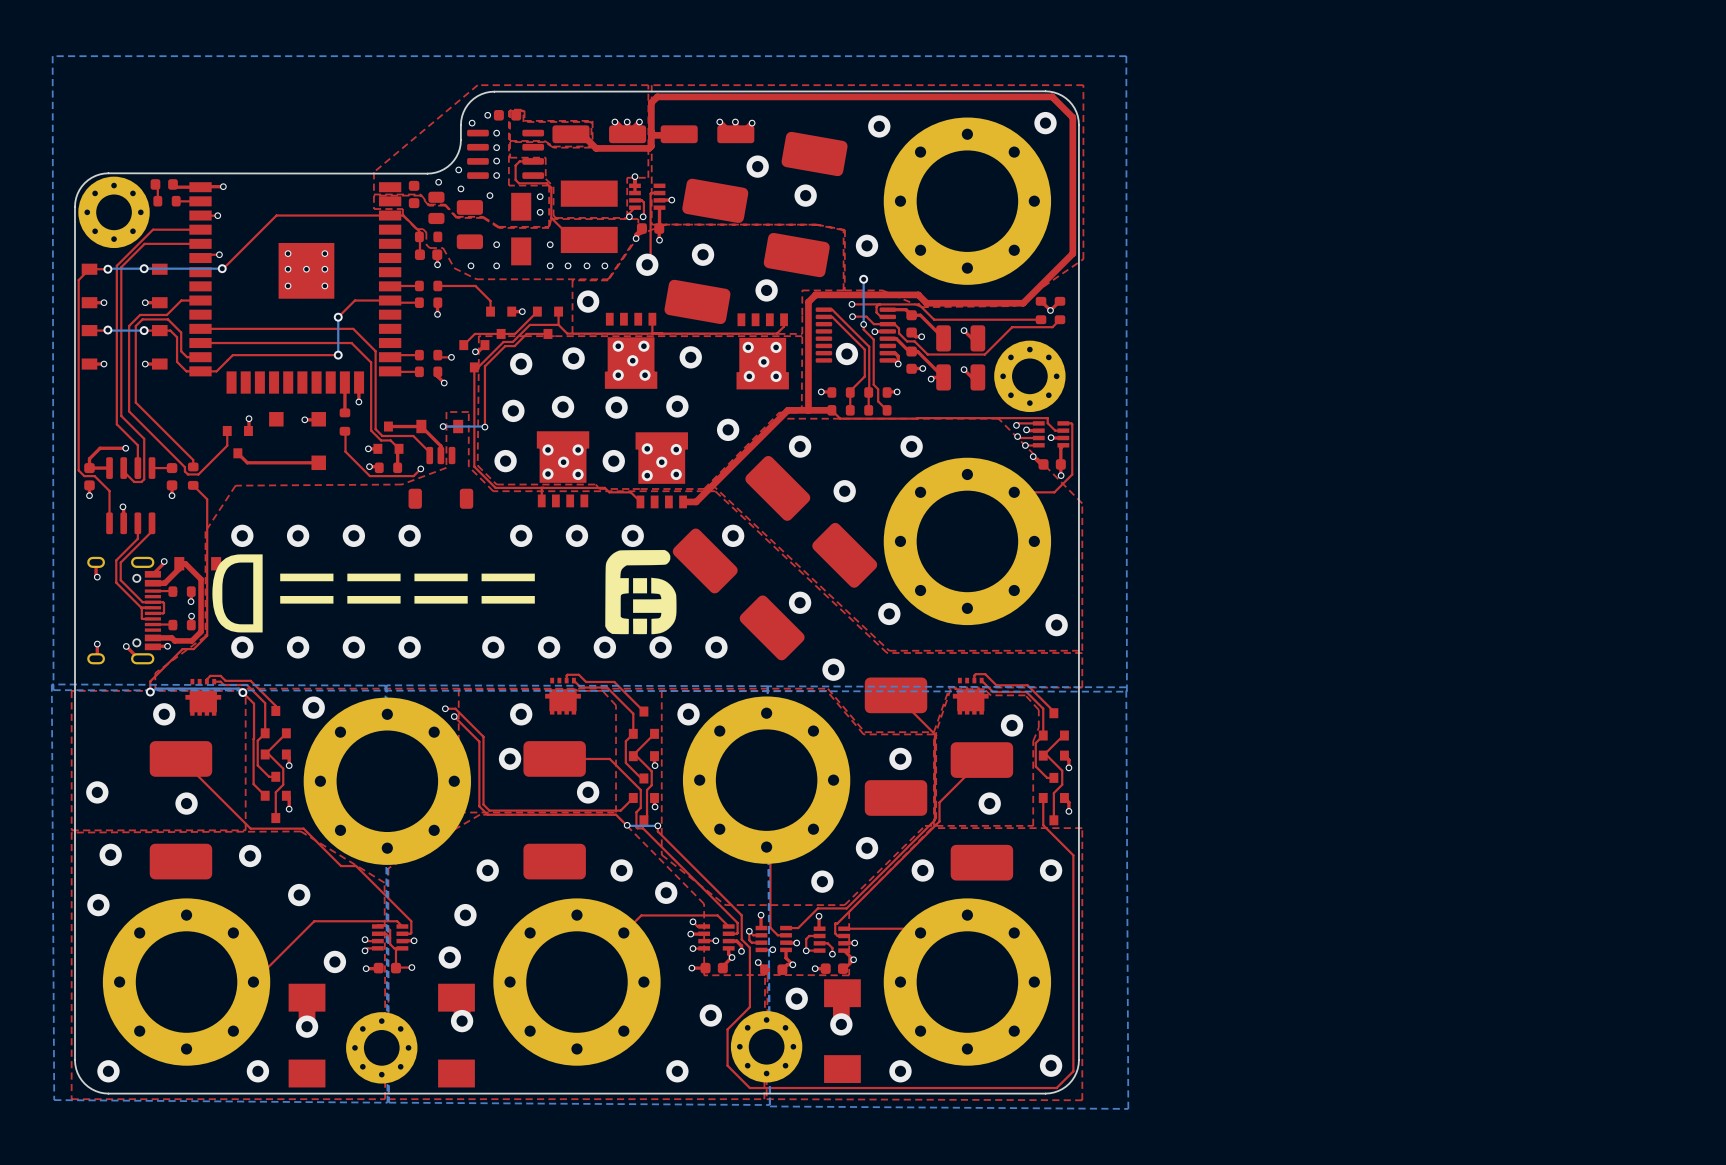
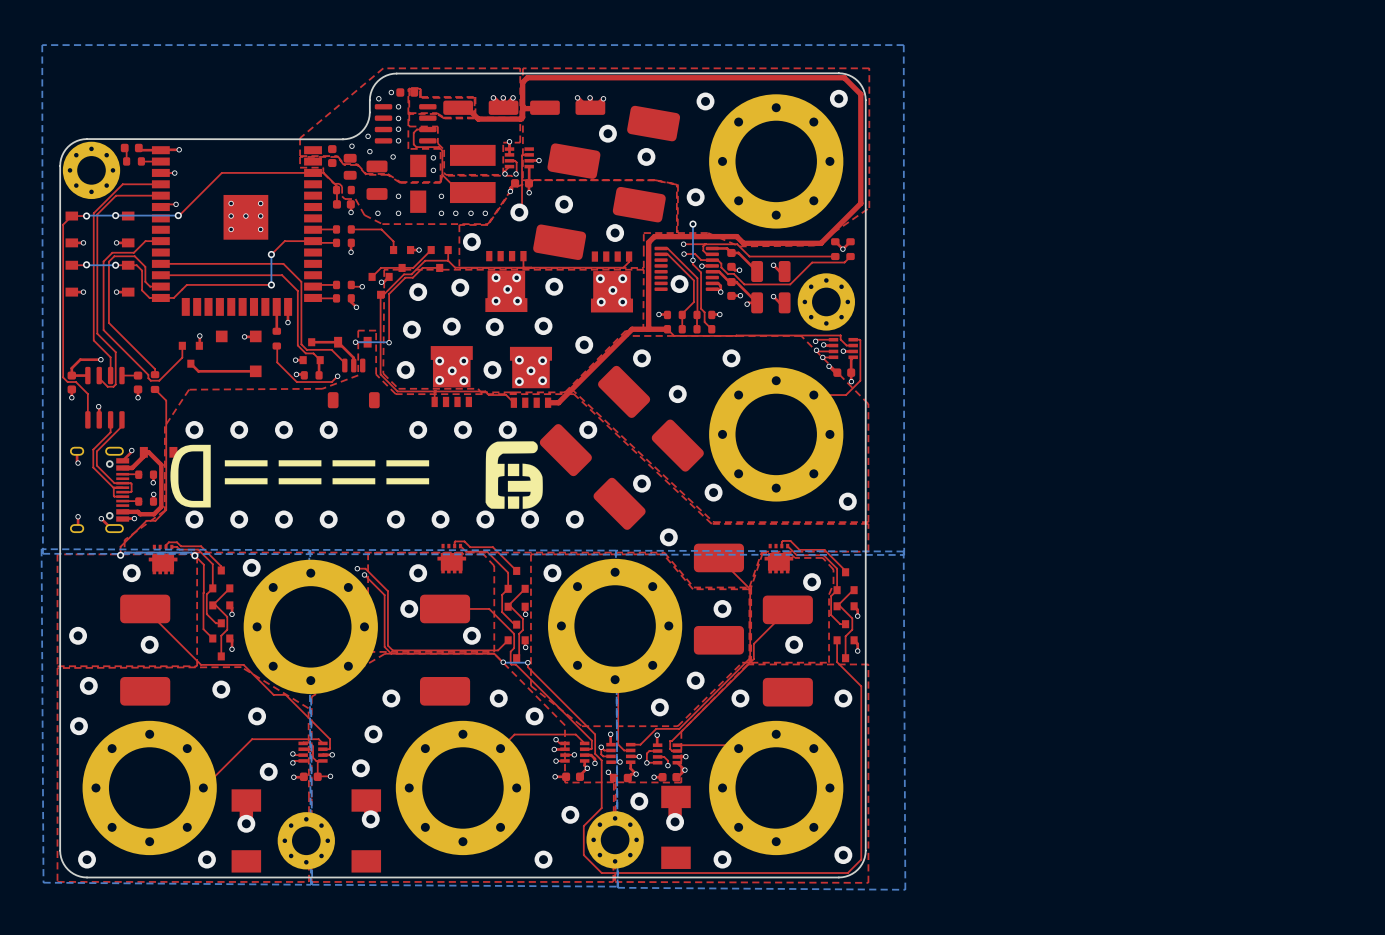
via: (250, 856) -> none
via: none -> (221, 689)
via: none -> (257, 716)
via: (299, 895) -> none

